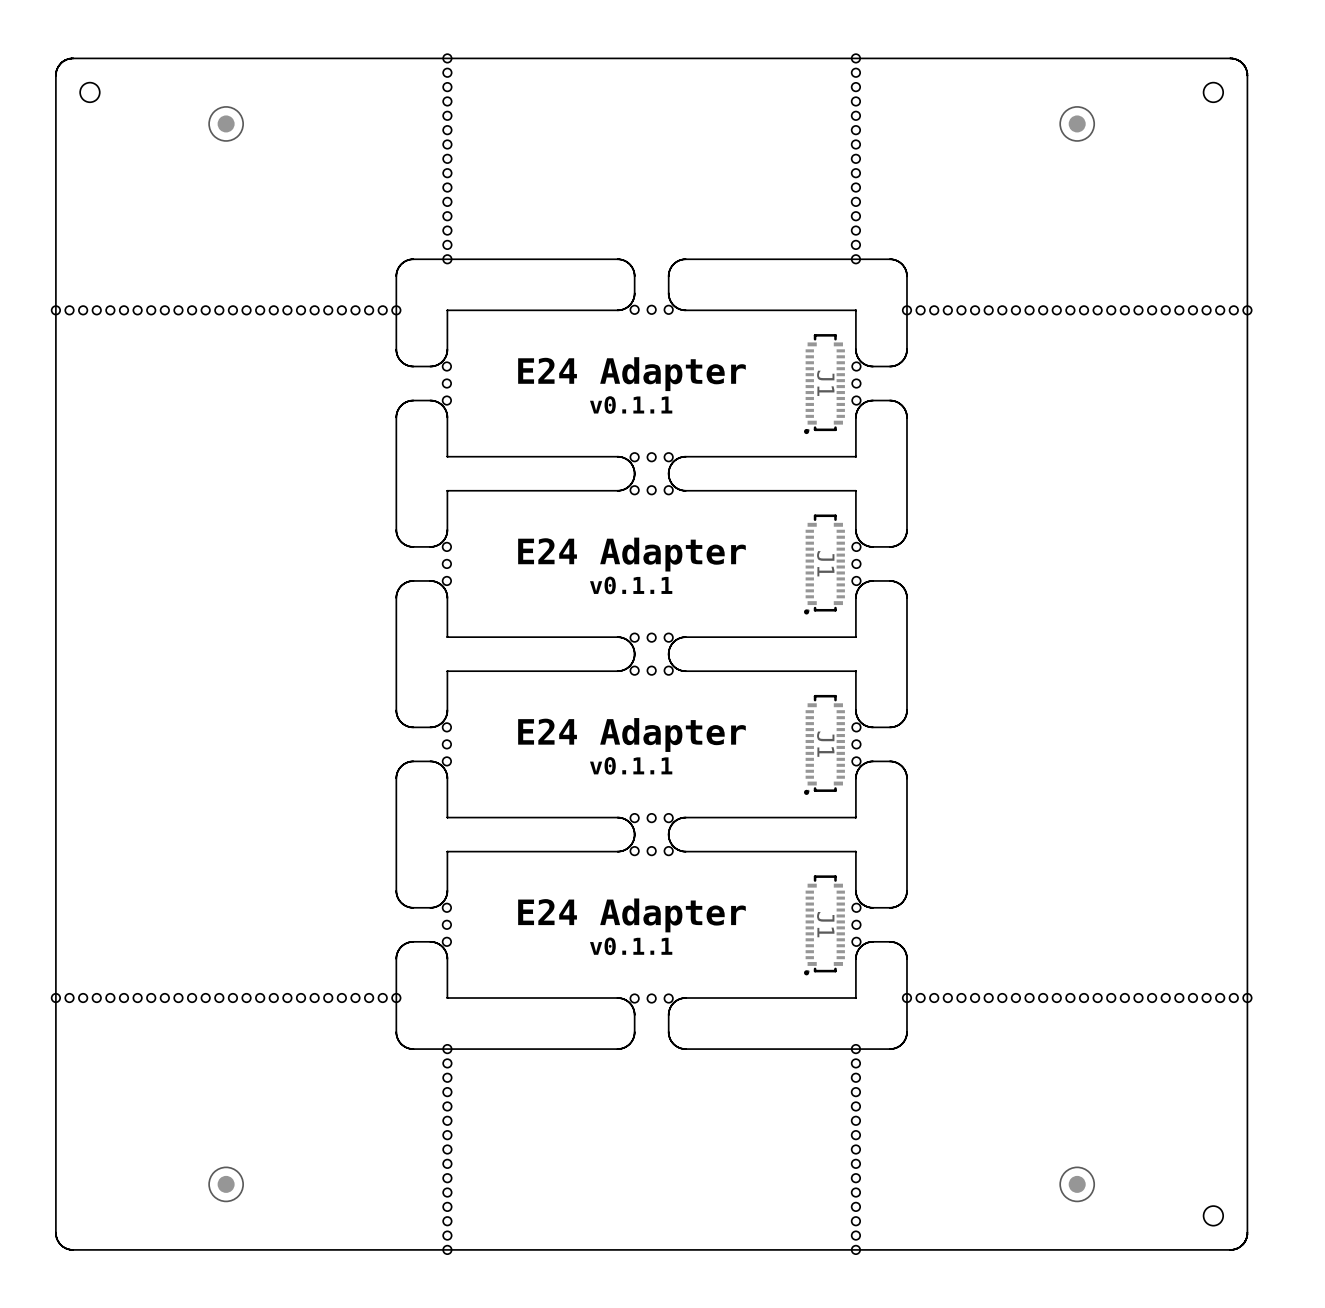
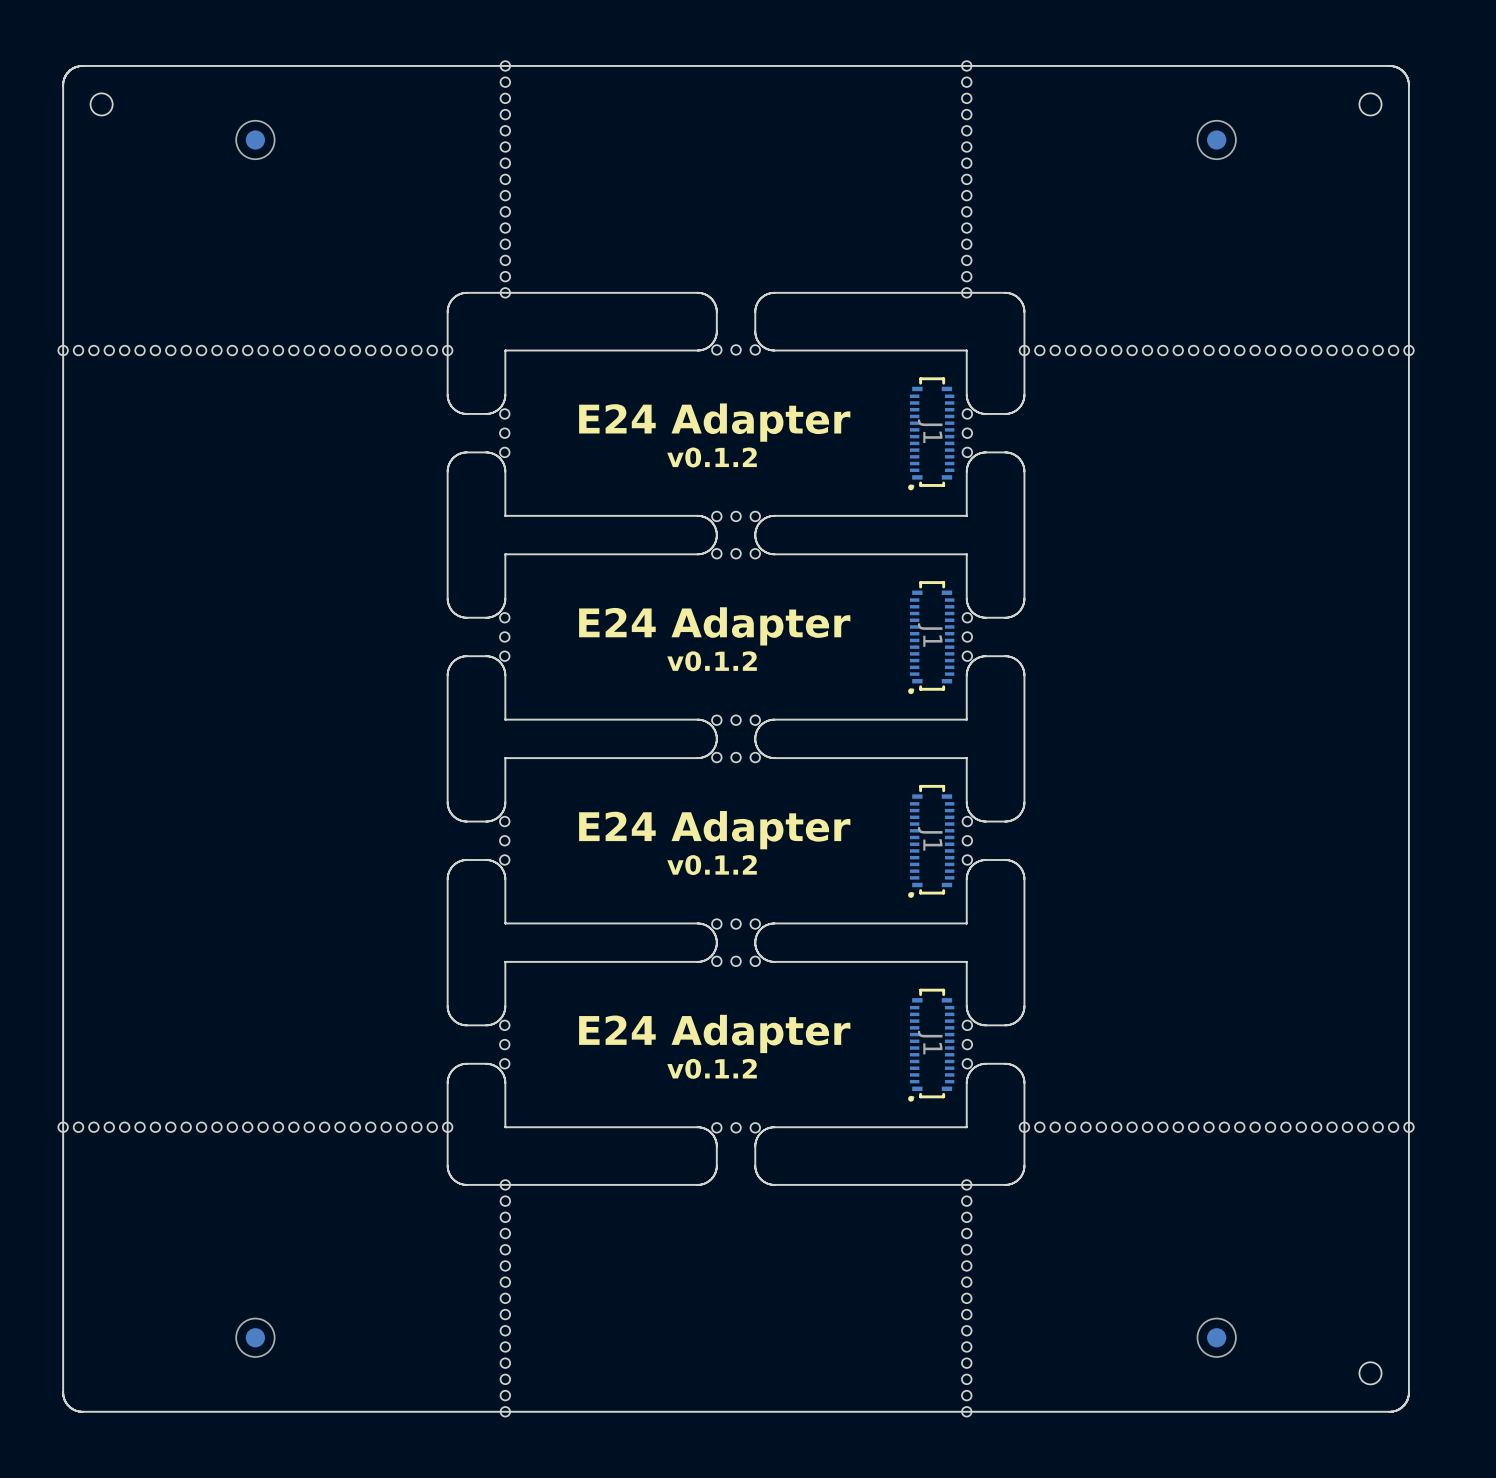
text: v0.1.1 (631, 405) -> v0.1.2 (712, 457)
text: v0.1.1 (631, 585) -> v0.1.2 (712, 661)
text: v0.1.1 (631, 765) -> v0.1.2 (712, 865)
text: v0.1.1 (631, 946) -> v0.1.2 (712, 1068)

